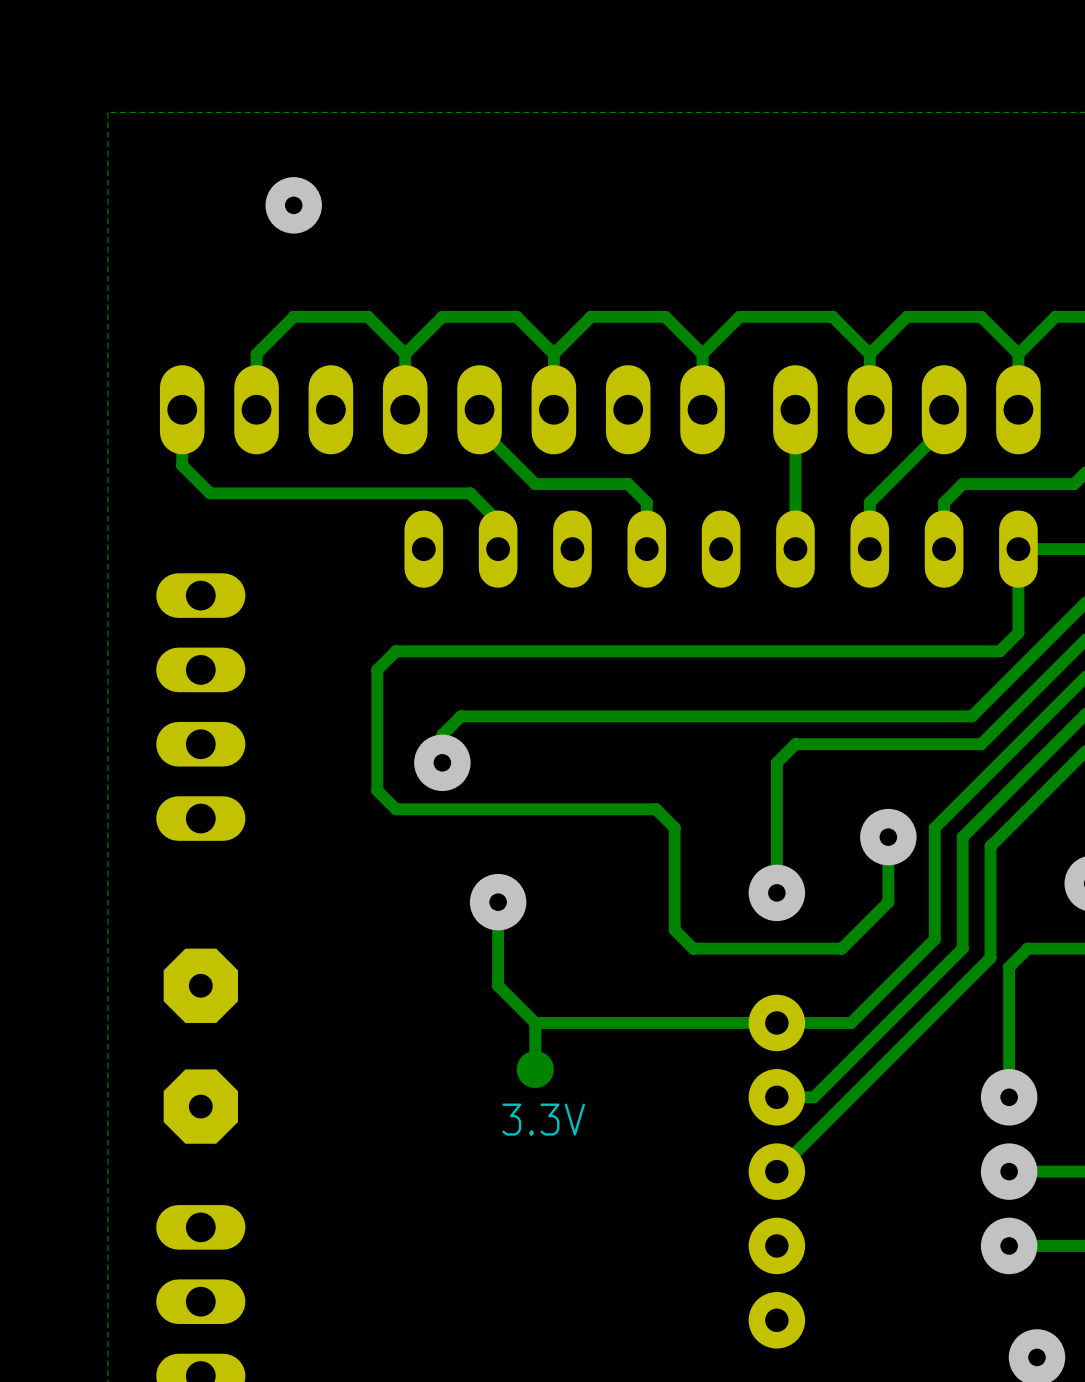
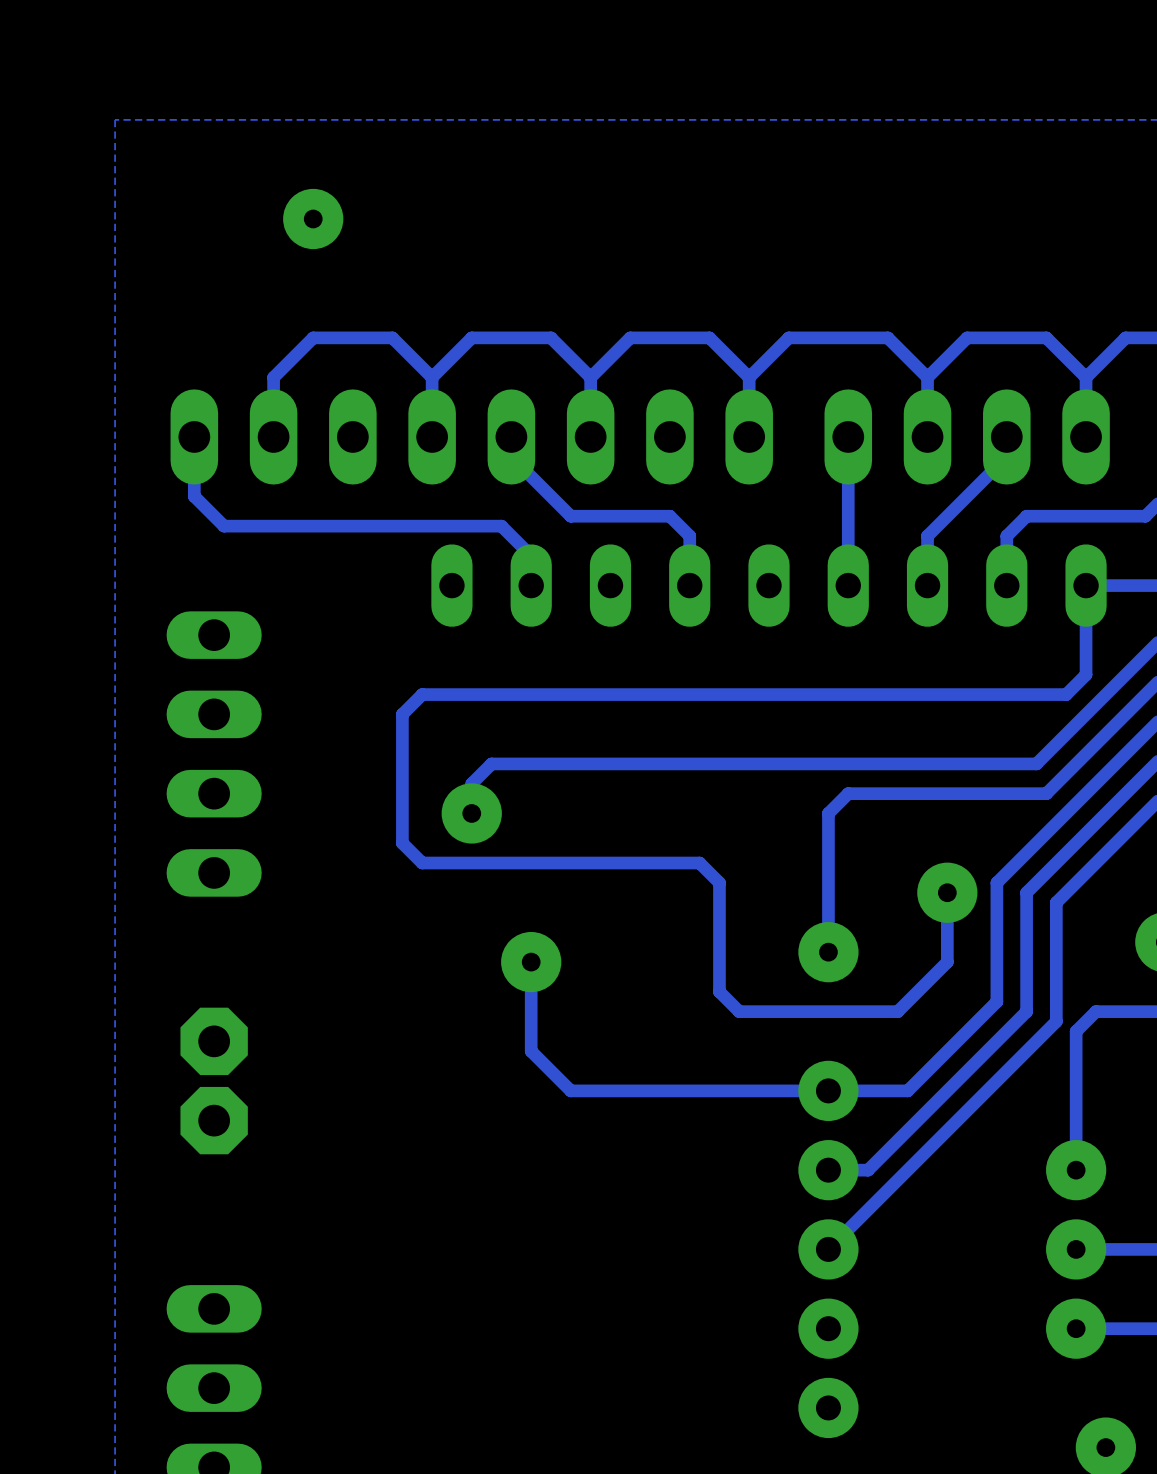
part footprint: [163, 948, 238, 1023] -> [180, 1007, 248, 1076]
track: (535, 1022) (535, 1069) -> none
part: none -> (214, 1120)
part: (535, 1069) -> none
part: (200, 1106) -> none
text: 3.3V (543, 1119) -> none

